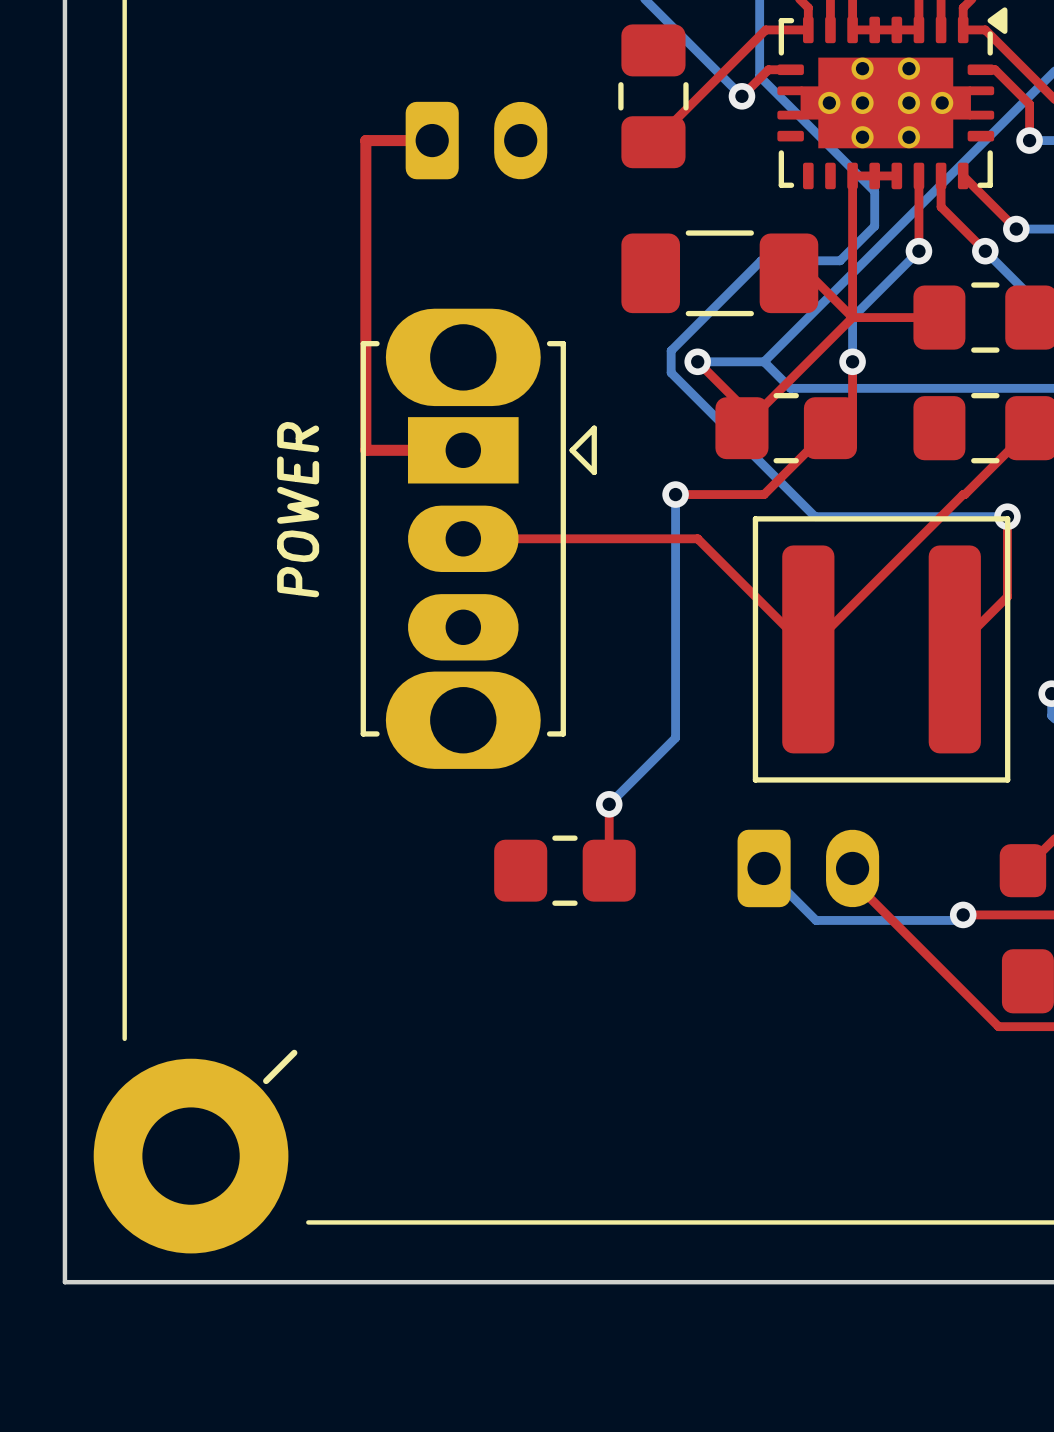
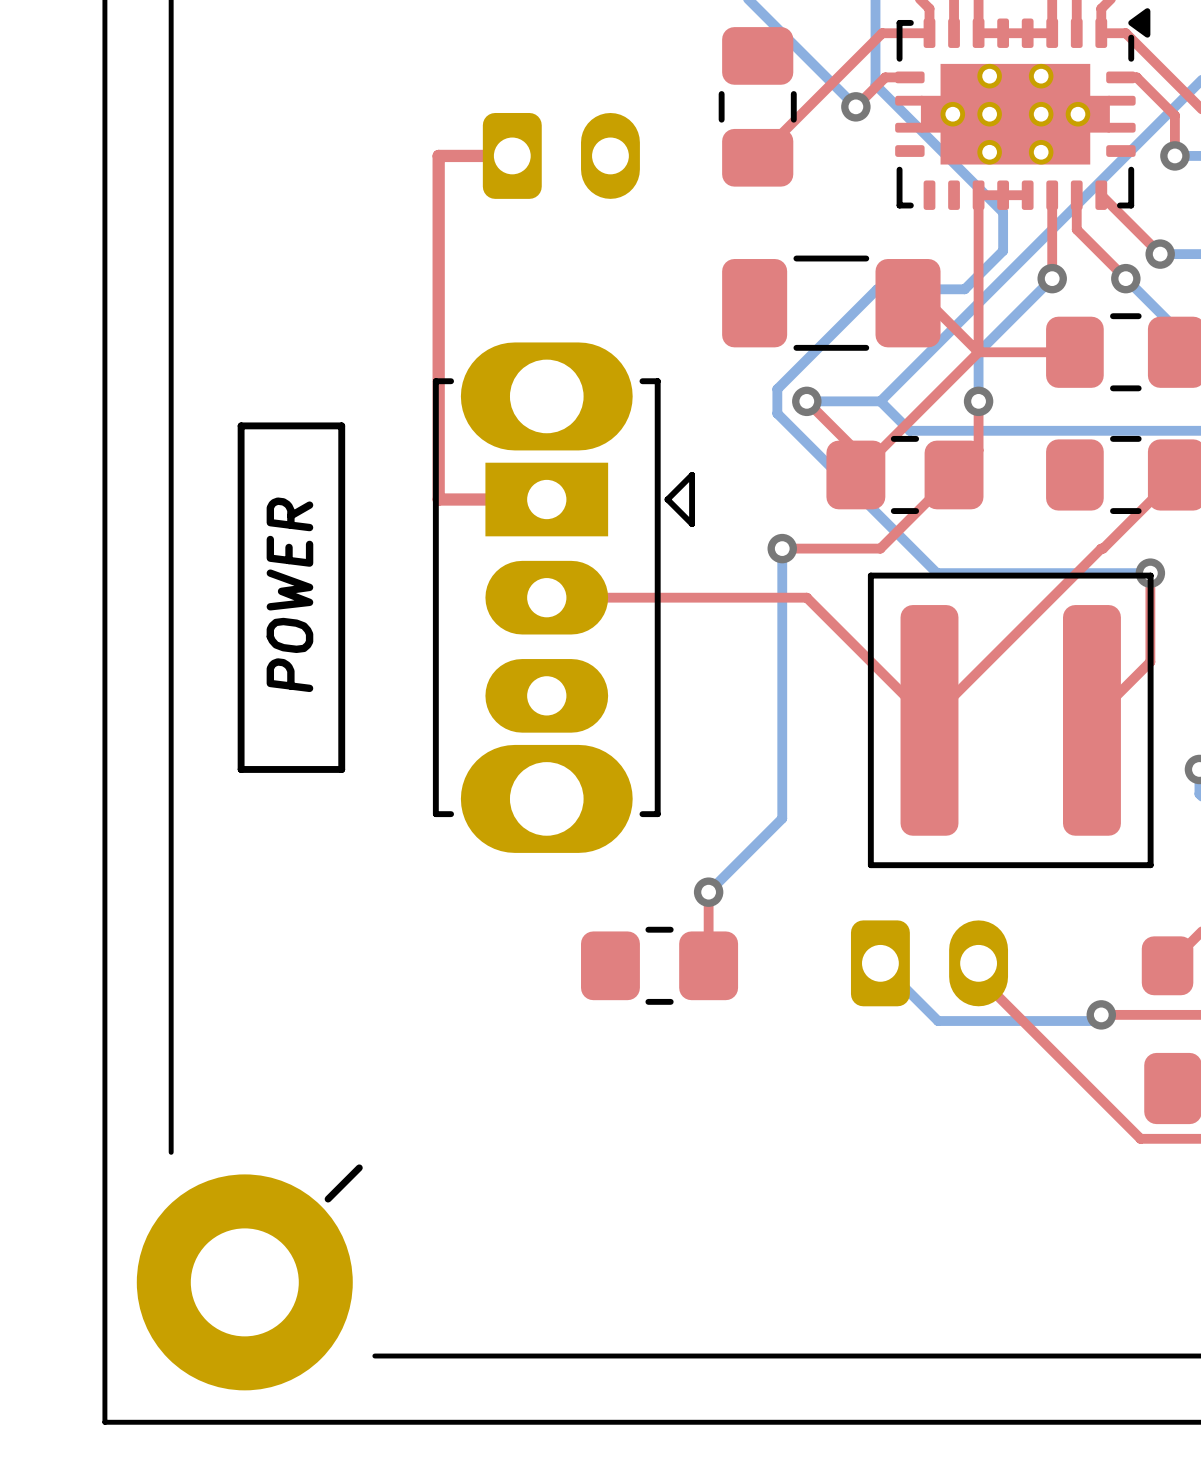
line: none -> (241, 425) (241, 769) (341, 769) (341, 425) (241, 425)
text position: POWER (298, 509) -> POWER (289, 594)

